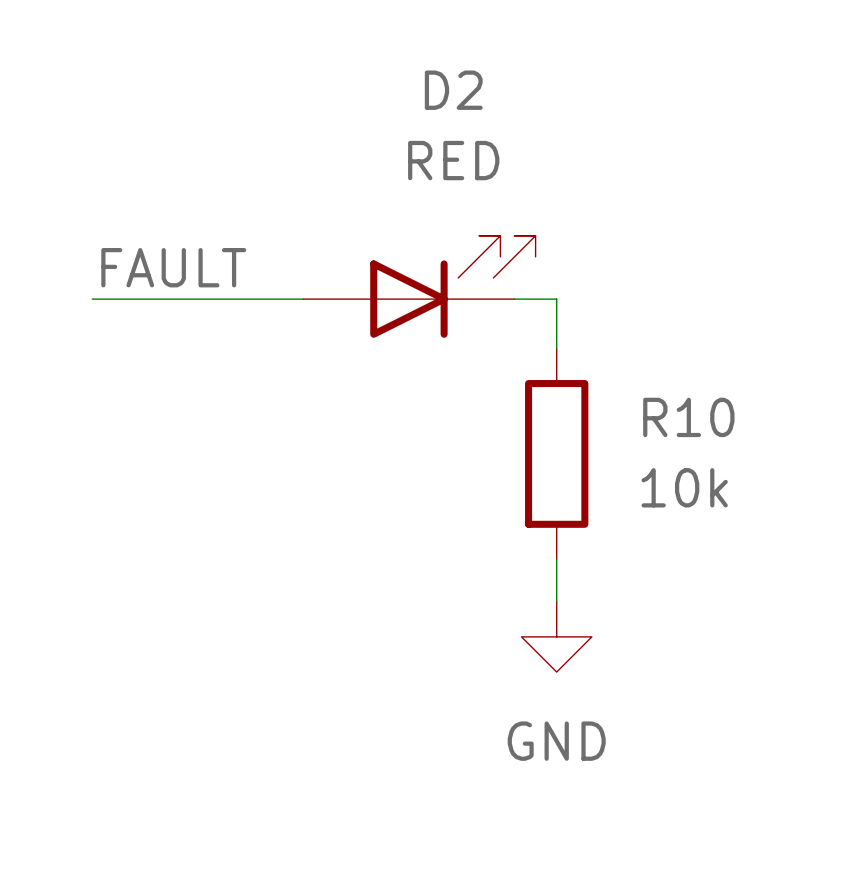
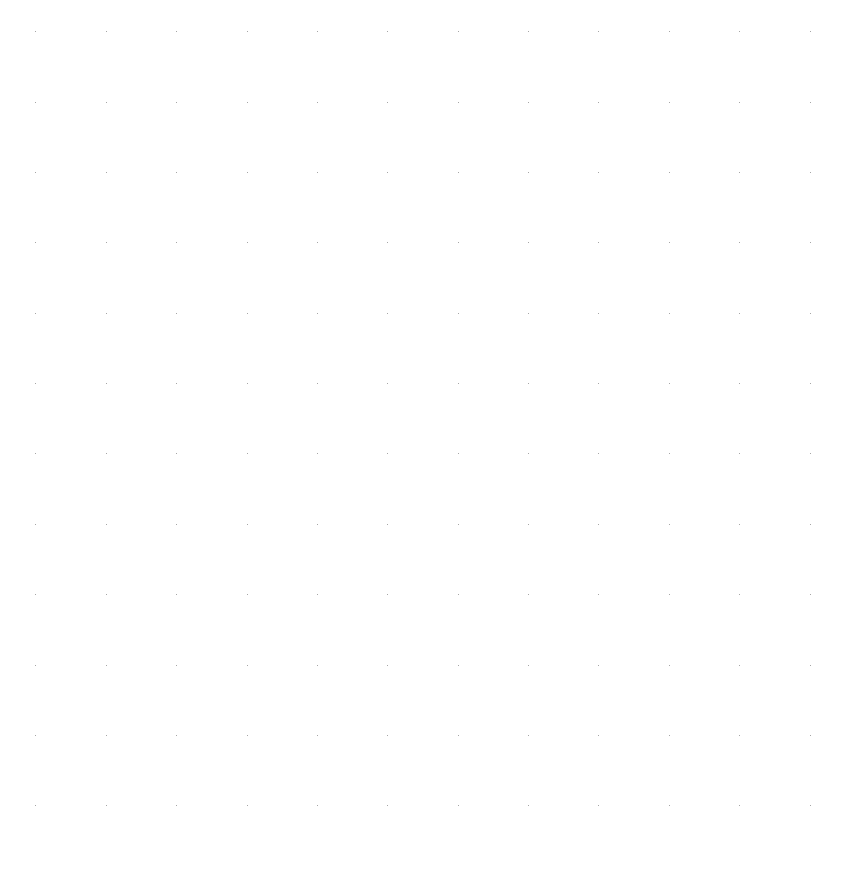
label: FAULT (173, 267) -> none
D2: RED (419, 286) -> none
wire: (92, 299) (303, 299) -> none
wire: (514, 299) (556, 299) (556, 348) -> none
R10: 10k (556, 453) -> none
wire: (556, 559) (556, 601) -> none
power symbol: GND (556, 636) -> none

